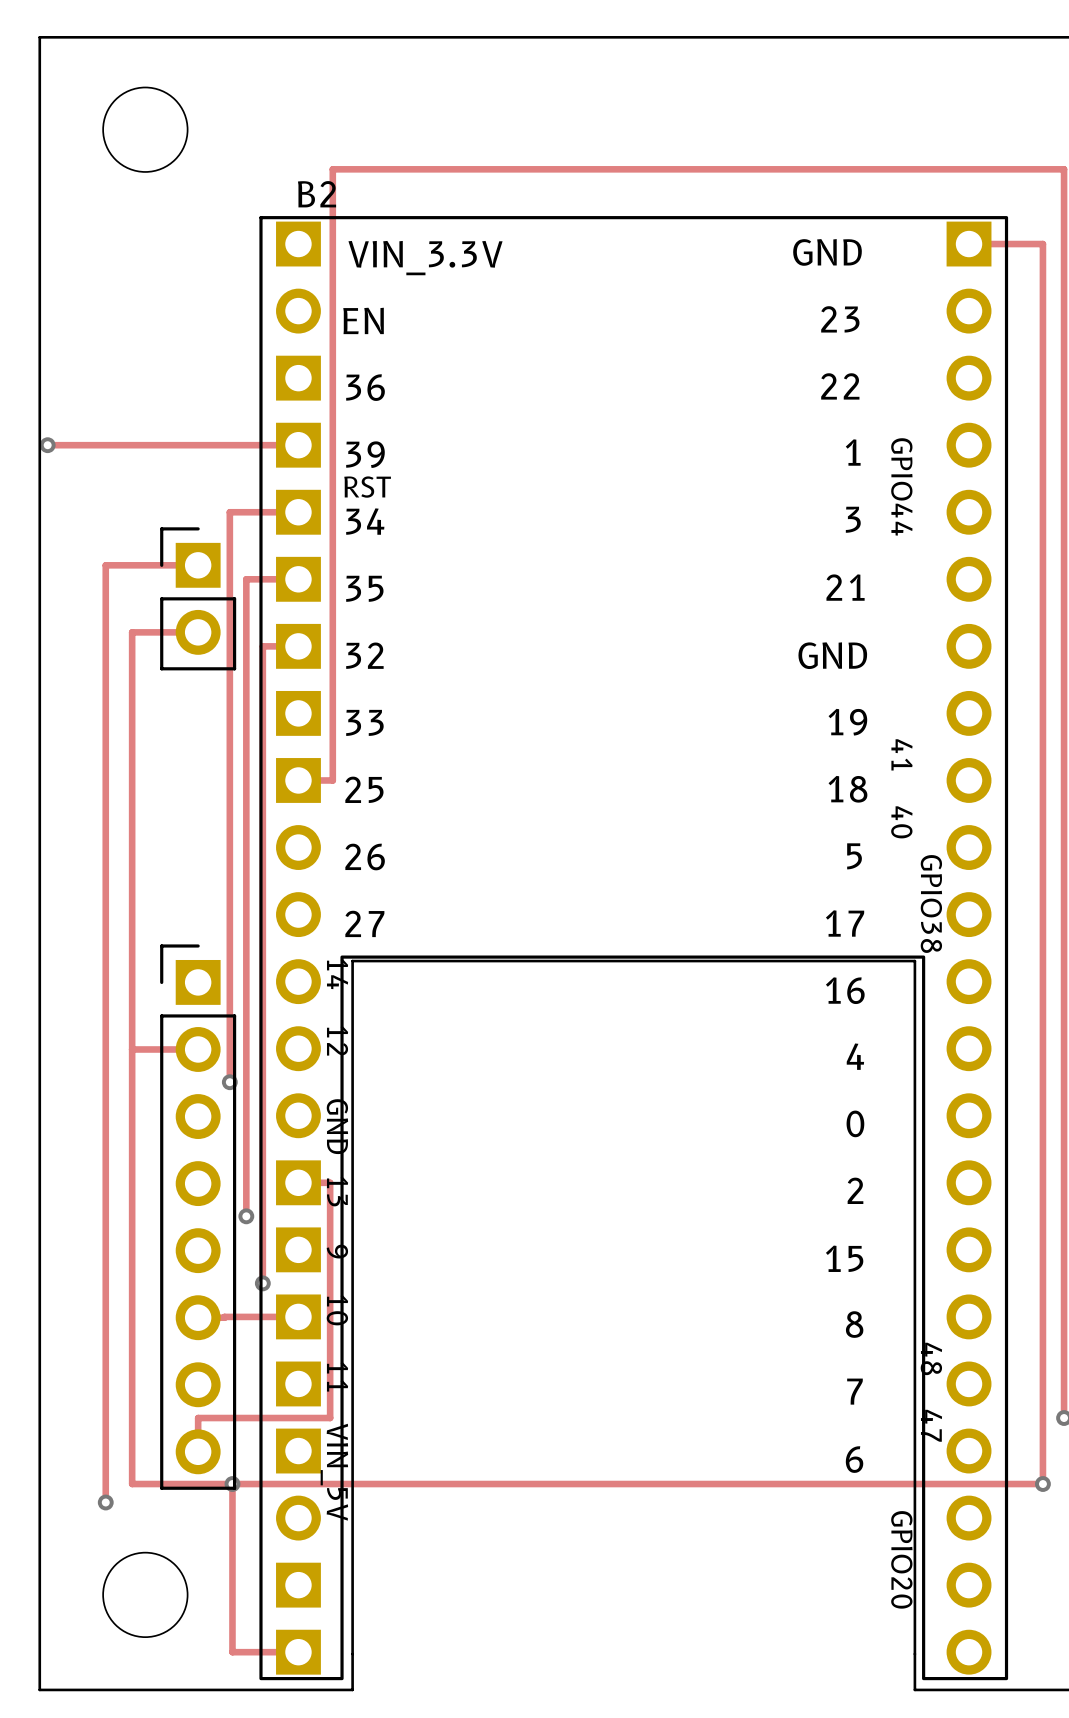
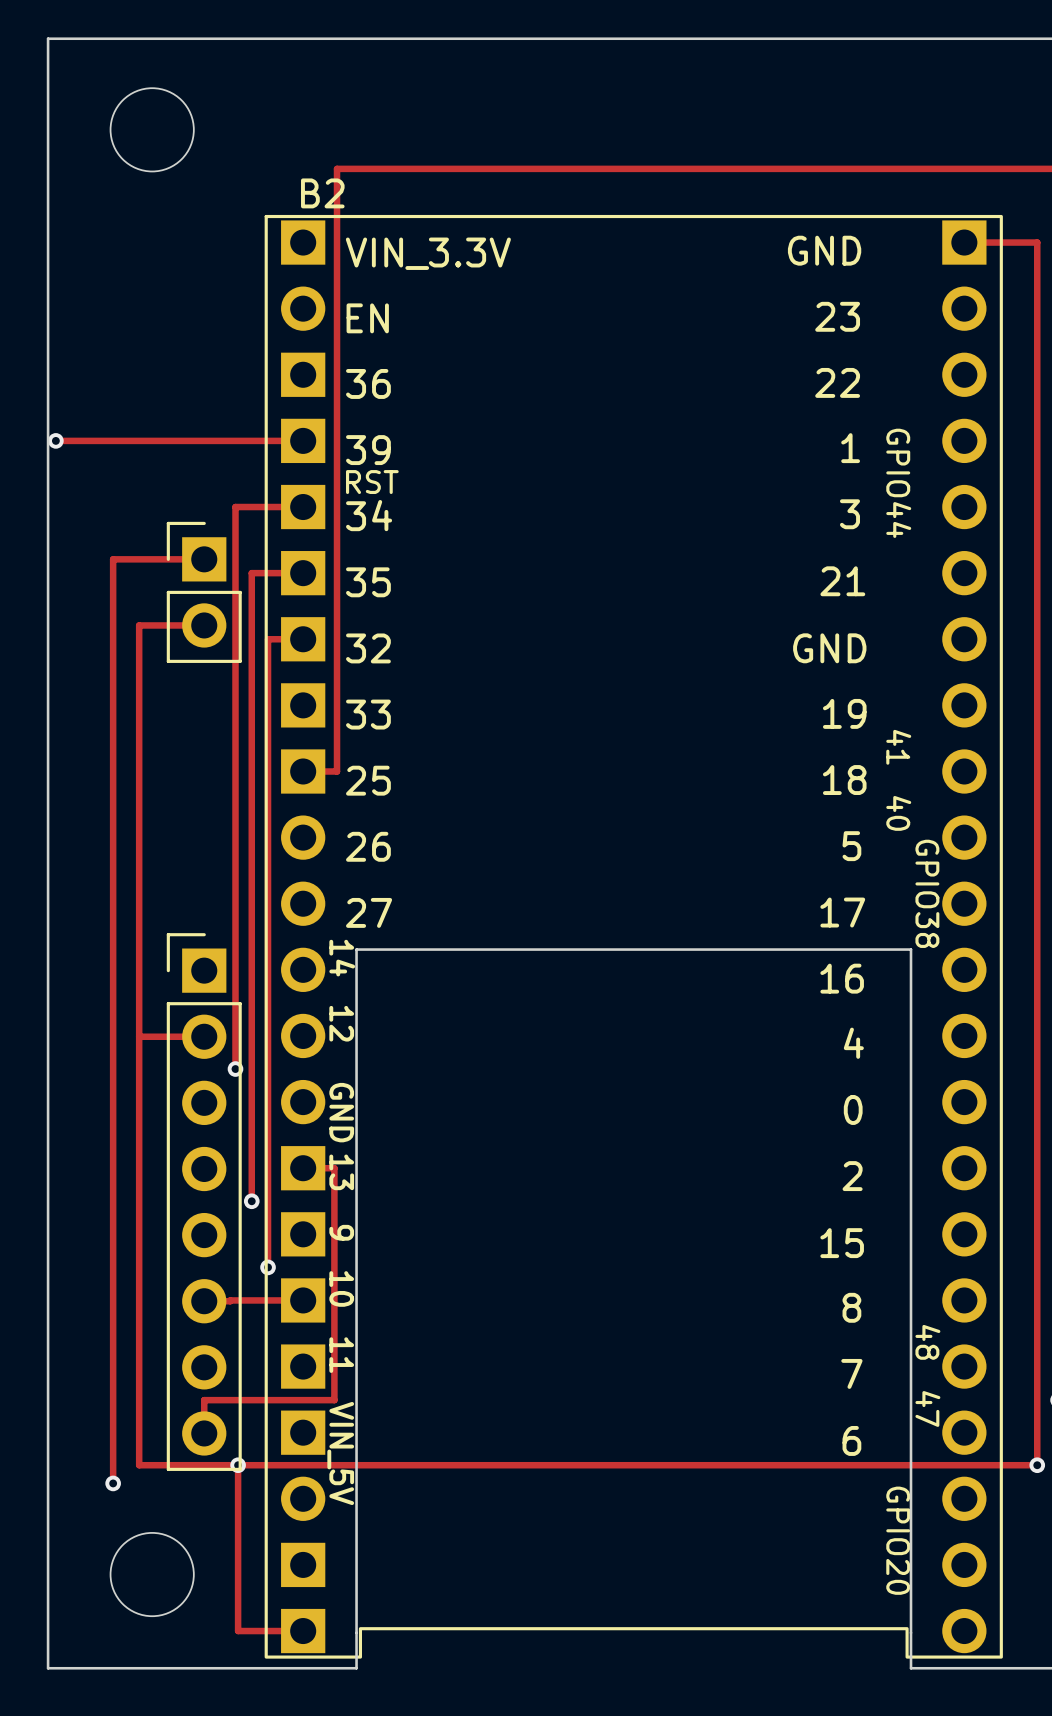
B2 footprint: [259, 216, 1009, 1681] -> [264, 214, 1003, 1659]

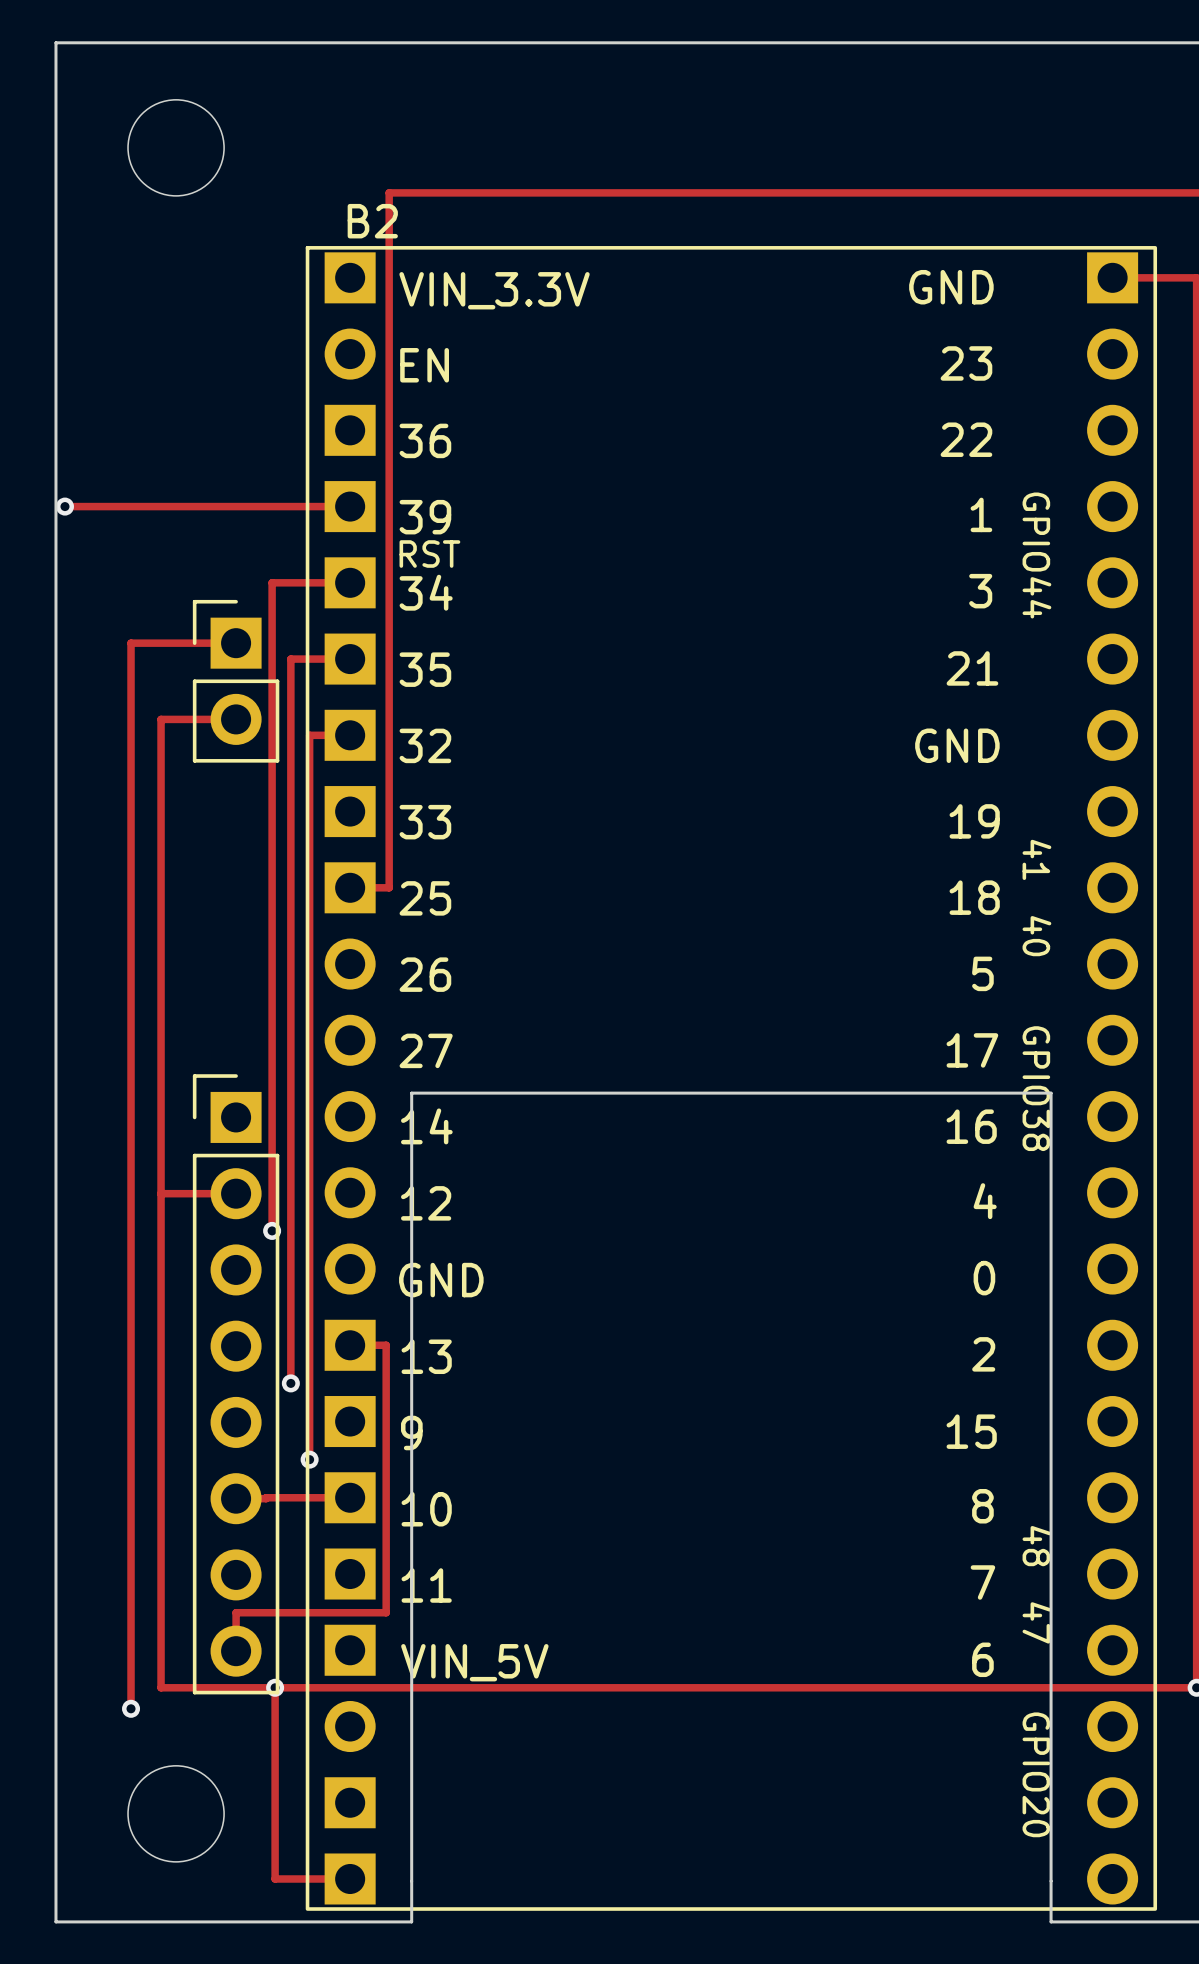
B2 footprint: [264, 214, 1003, 1659] -> [305, 246, 1158, 1911]

